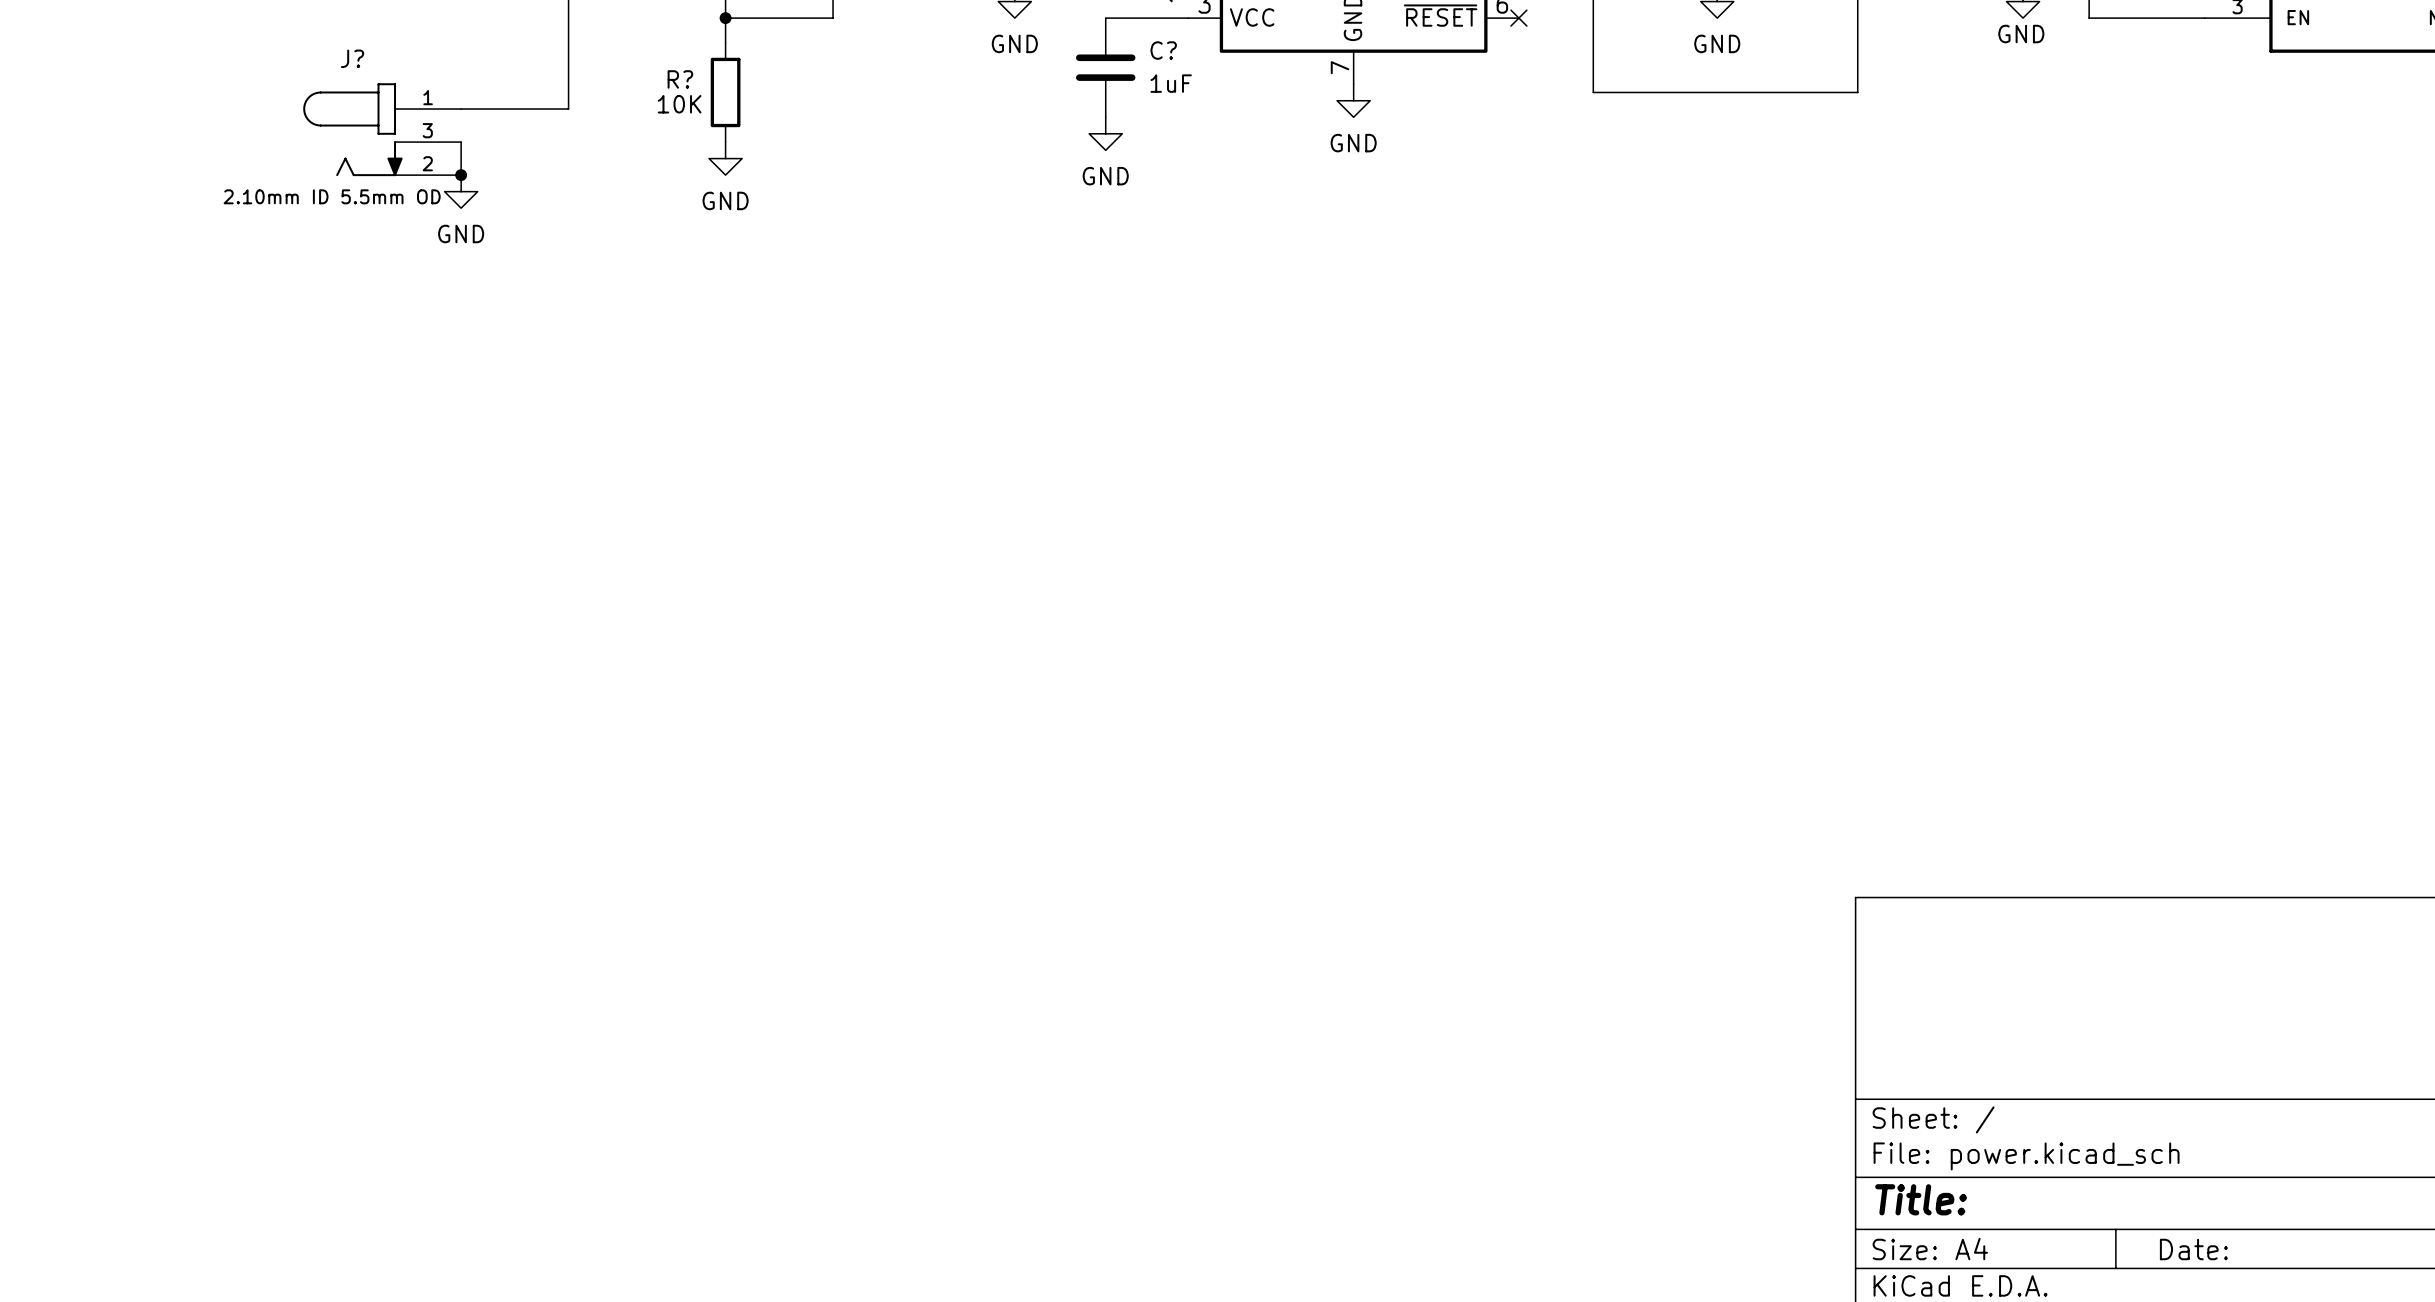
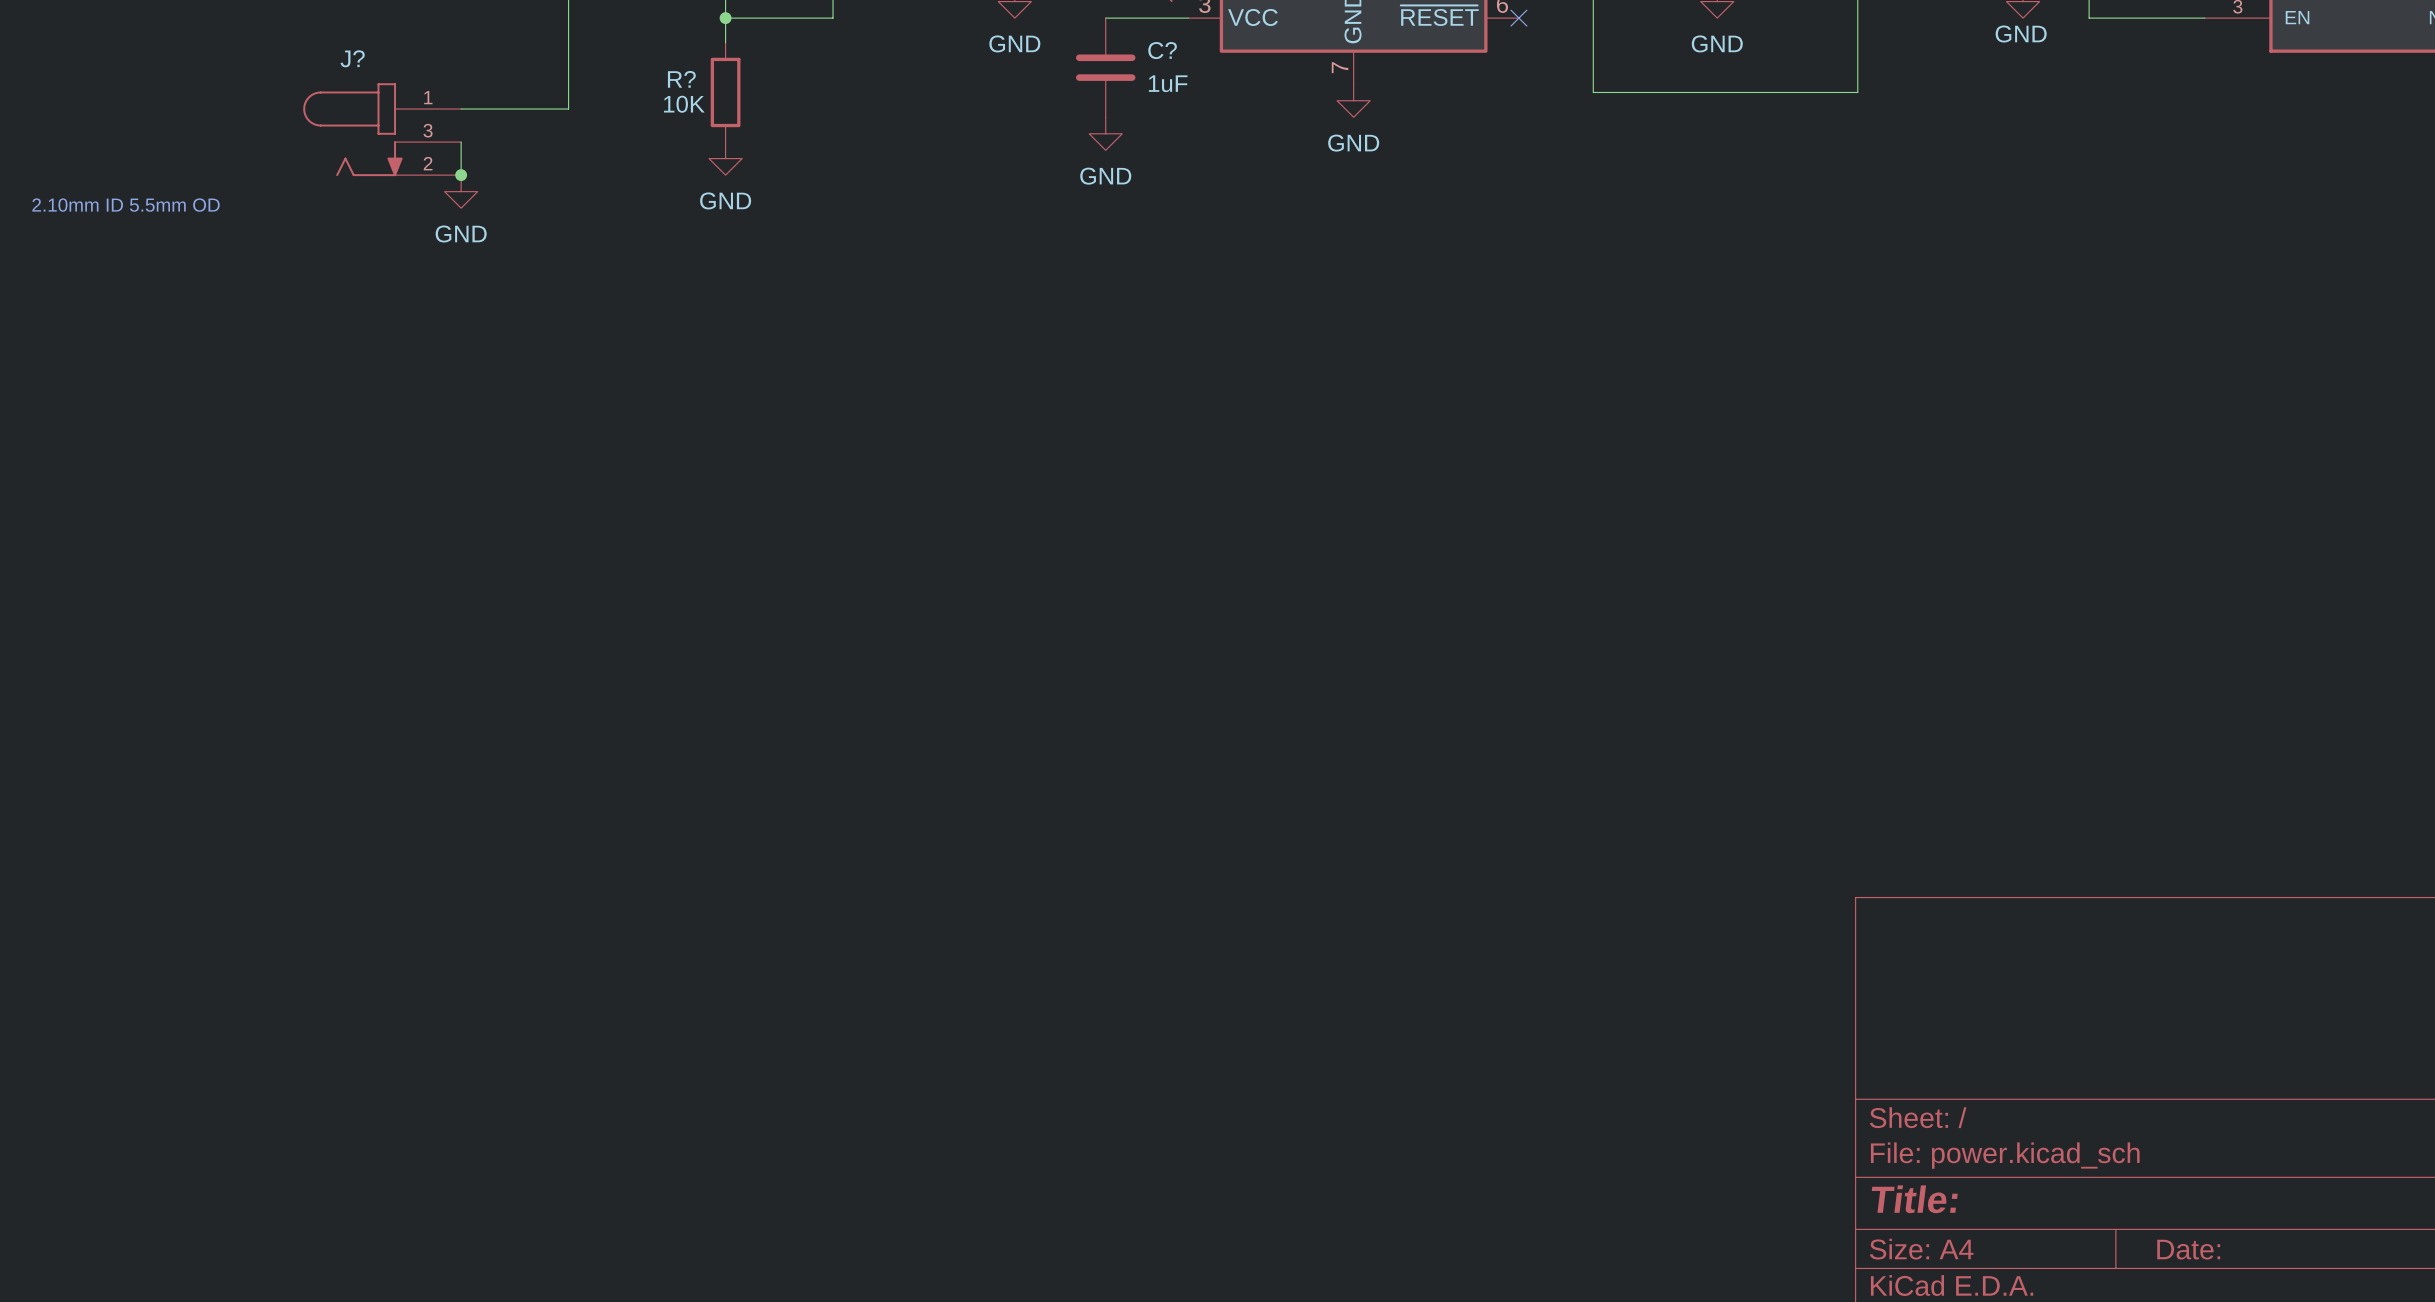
text position: 2.10mm ID 5.5mm OD (332, 196) -> 2.10mm ID 5.5mm OD (126, 205)

